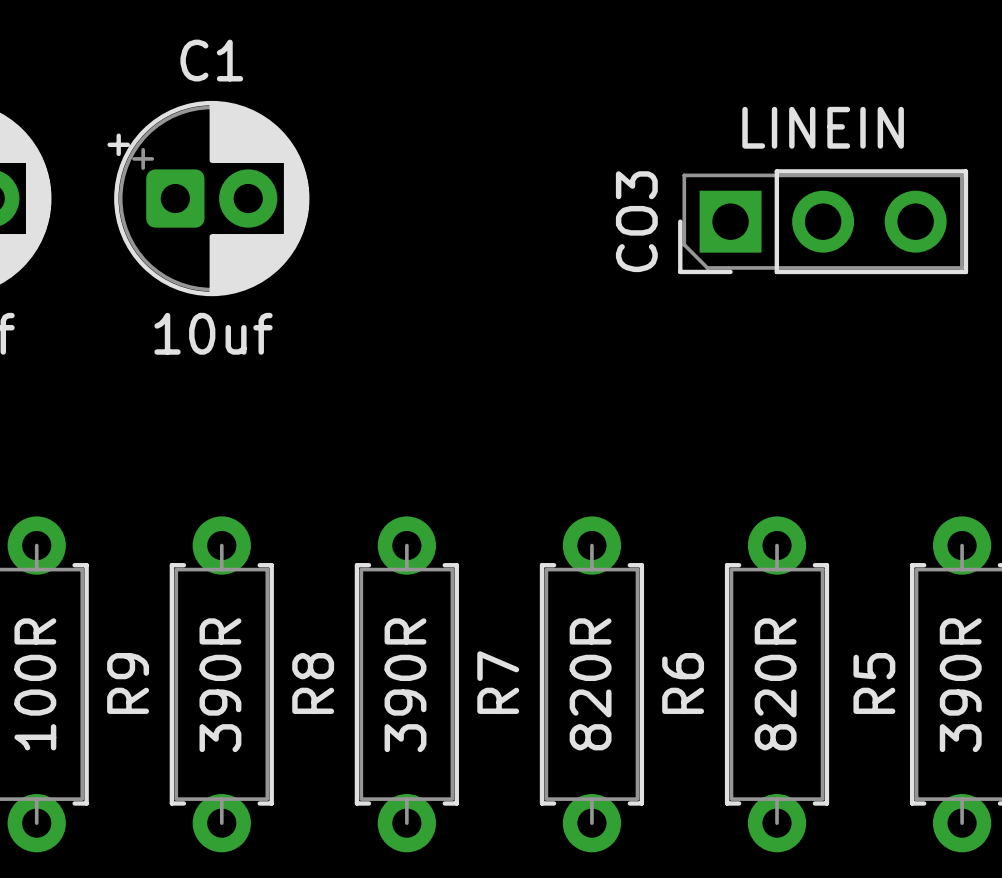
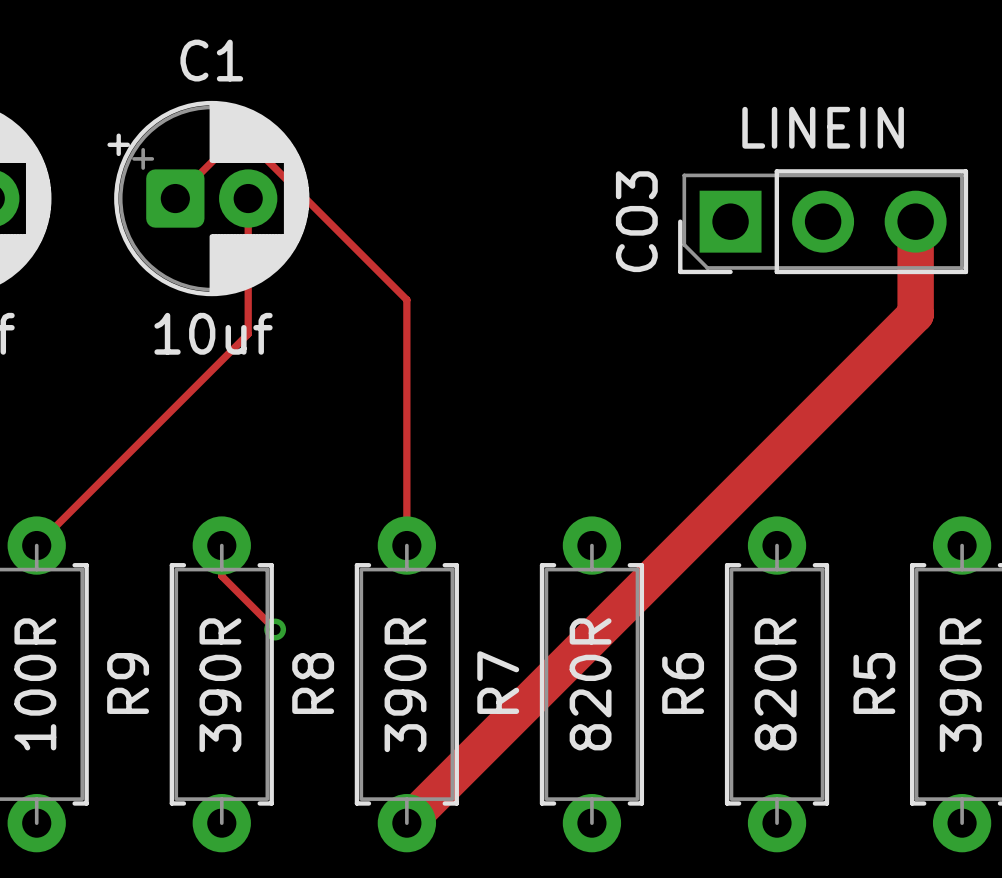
track: none -> (175, 198) (215, 158) (265, 158) (406, 299) (406, 545)
track: none -> (248, 198) (248, 334) (36, 545)
track: none -> (915, 221) (915, 314) (406, 823)
track: none -> (221, 545) (221, 576) (275, 629)
via: none -> (275, 629)

